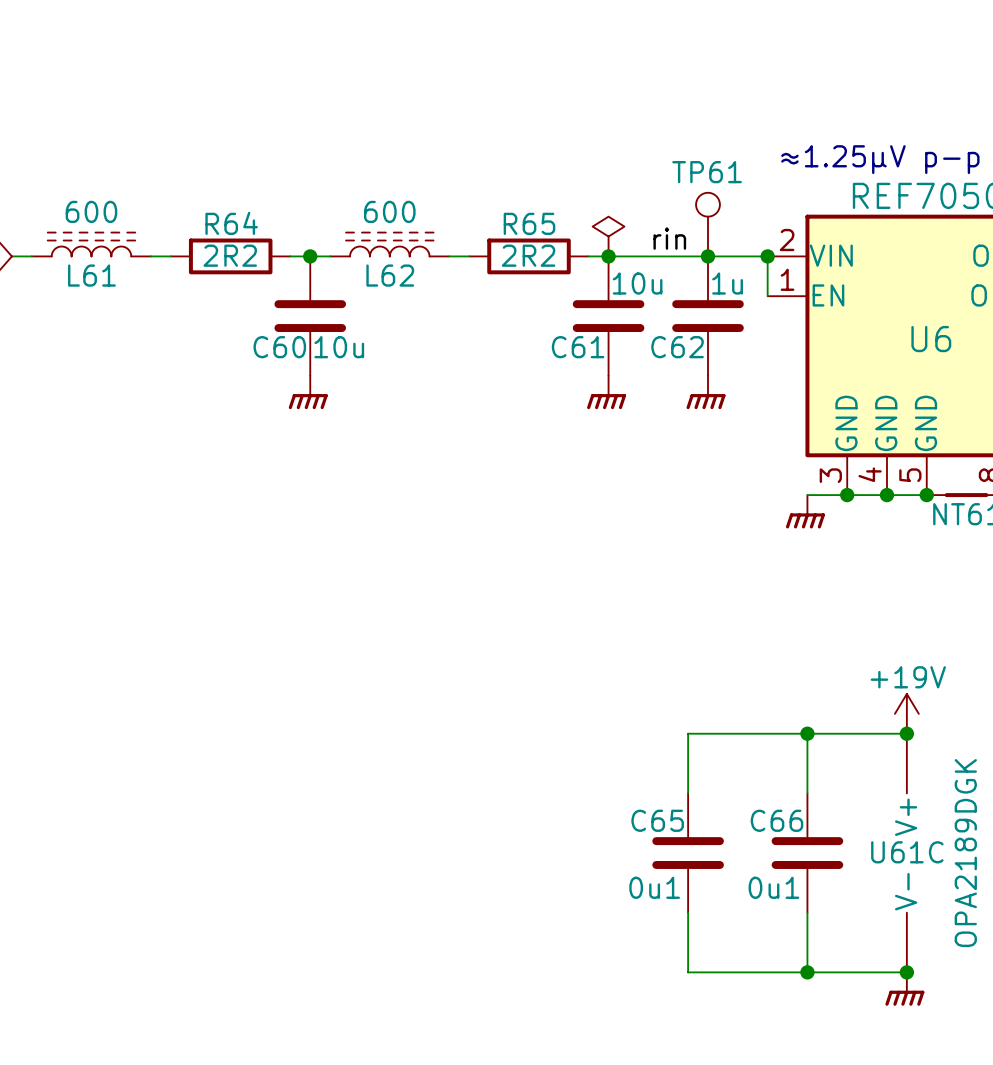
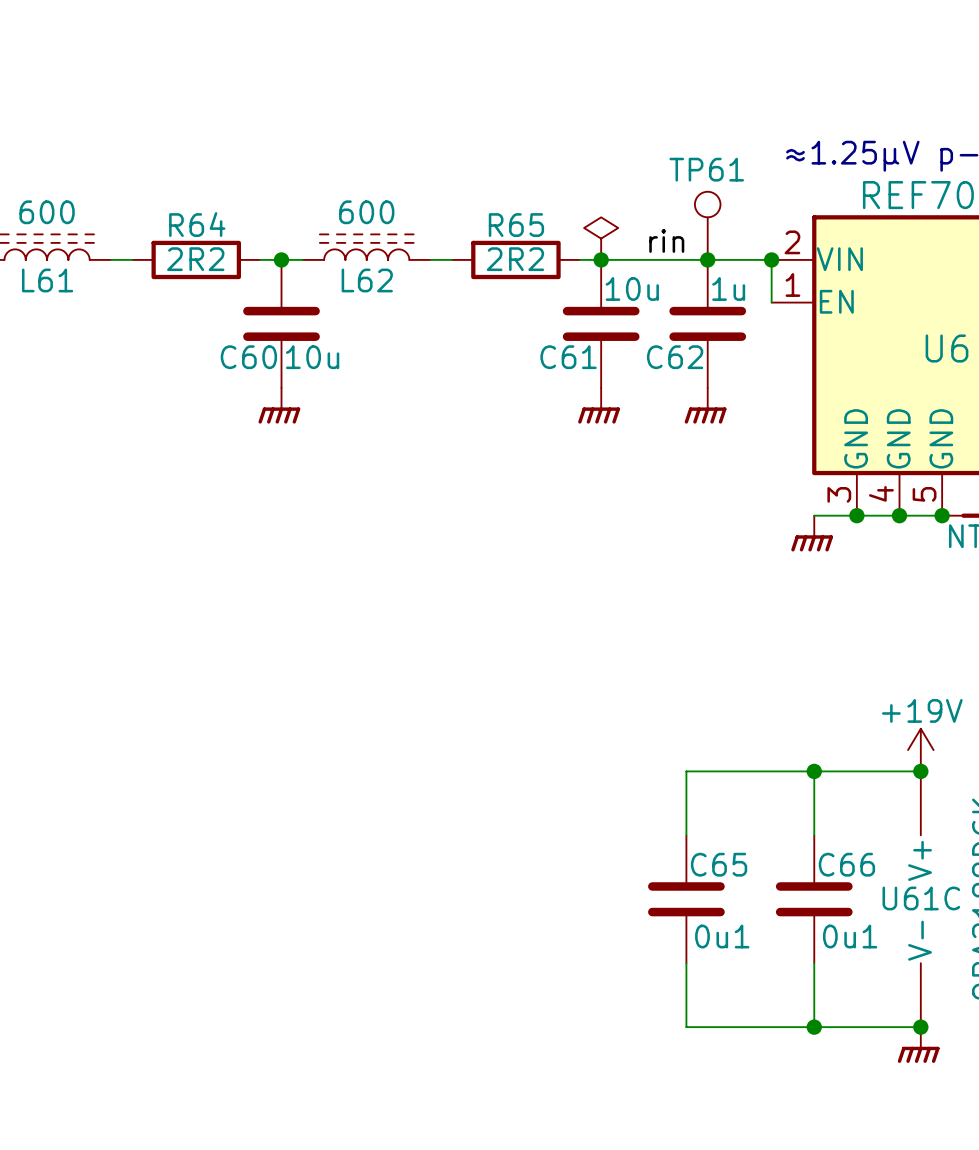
C65 name position: C65 (657, 820) -> C65 (719, 864)
C66 name position: C66 (776, 820) -> C66 (846, 864)
C65 value position: 0u1 (654, 887) -> 0u1 (722, 936)
C66 value position: 0u1 (773, 887) -> 0u1 (850, 936)

